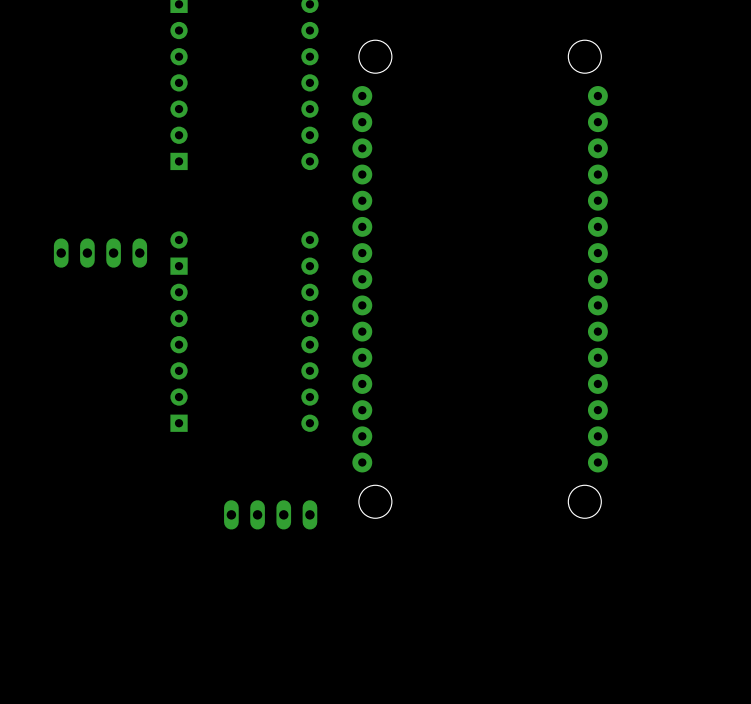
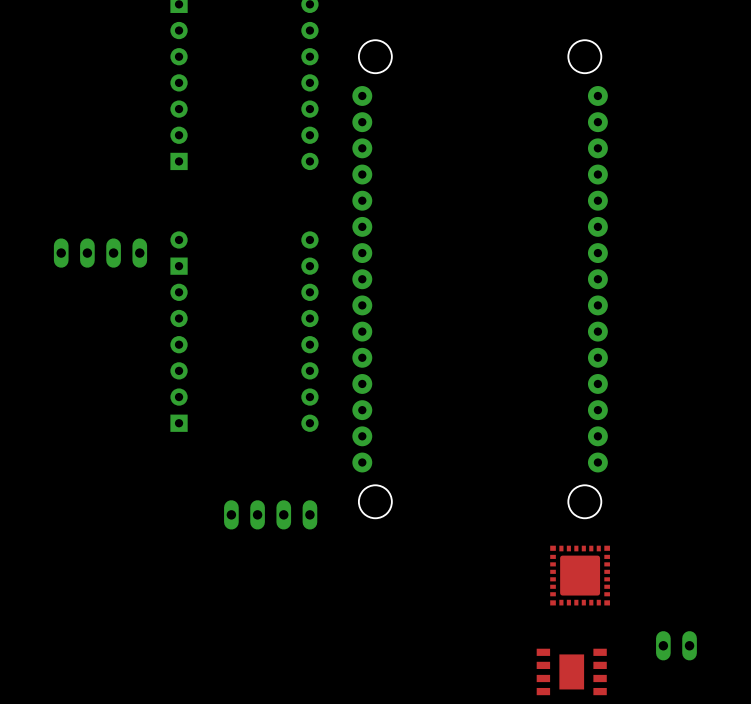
part: none -> (580, 575)
part: none -> (676, 645)
part: none -> (571, 671)

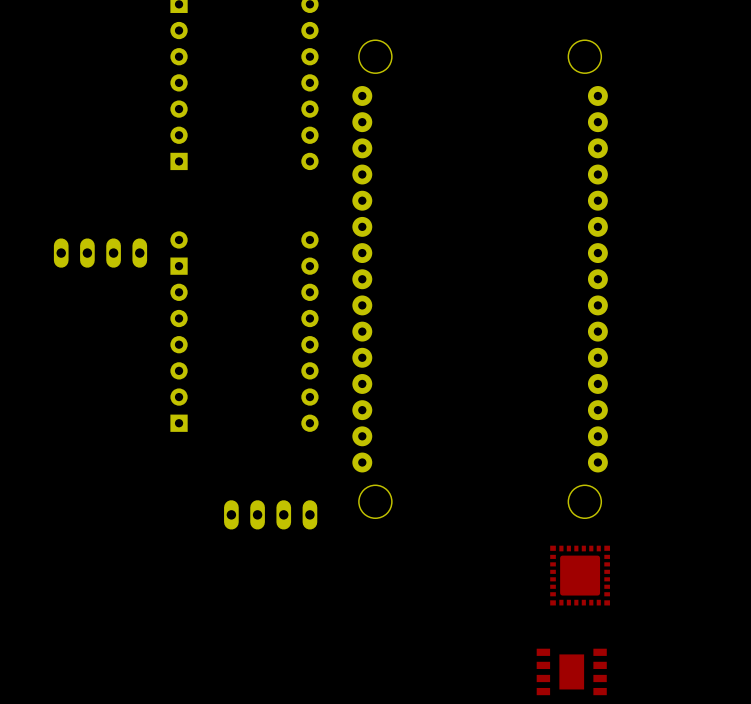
part: (676, 645) -> none

